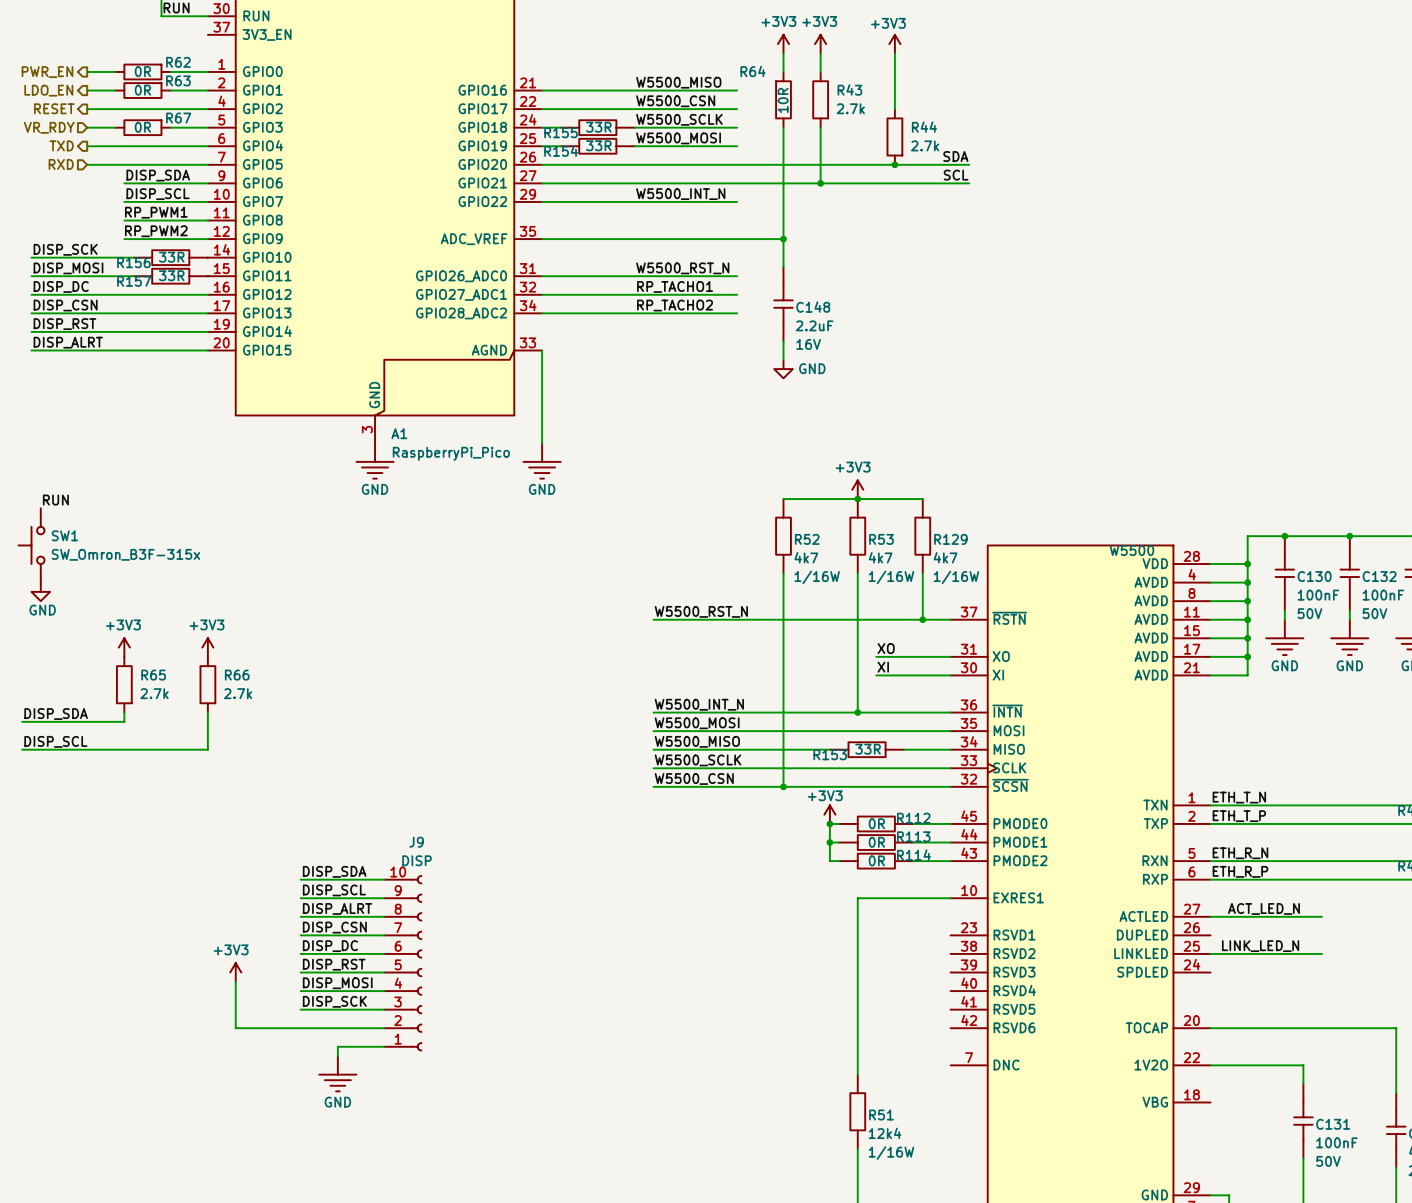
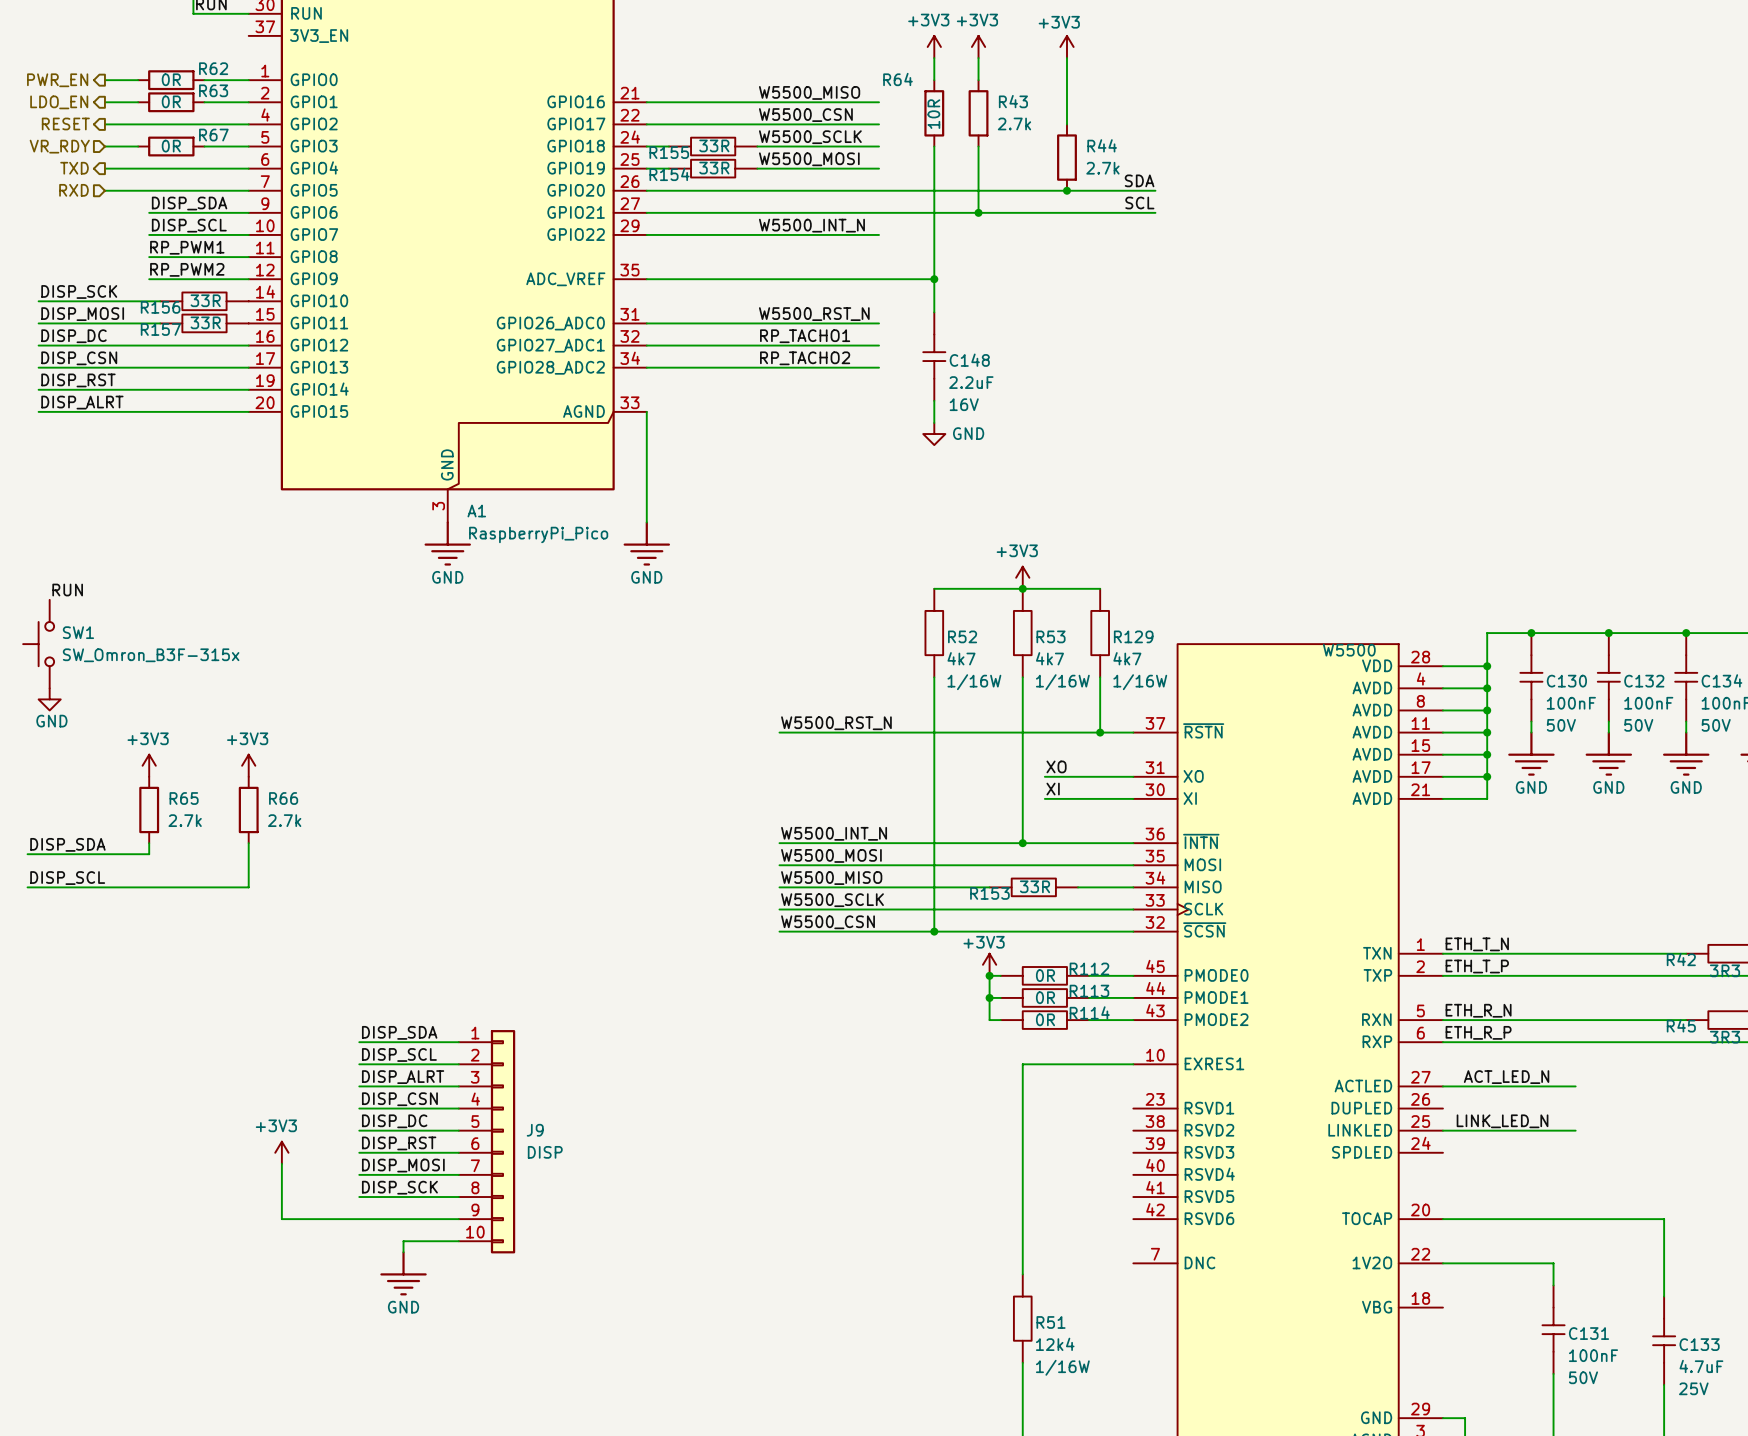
J9 name position: J9 (416, 842) -> J9 (535, 1130)
J9 value position: DISP (417, 860) -> DISP (545, 1152)
J9 symbol: [384, 875, 422, 1052] -> [458, 1030, 516, 1254]

